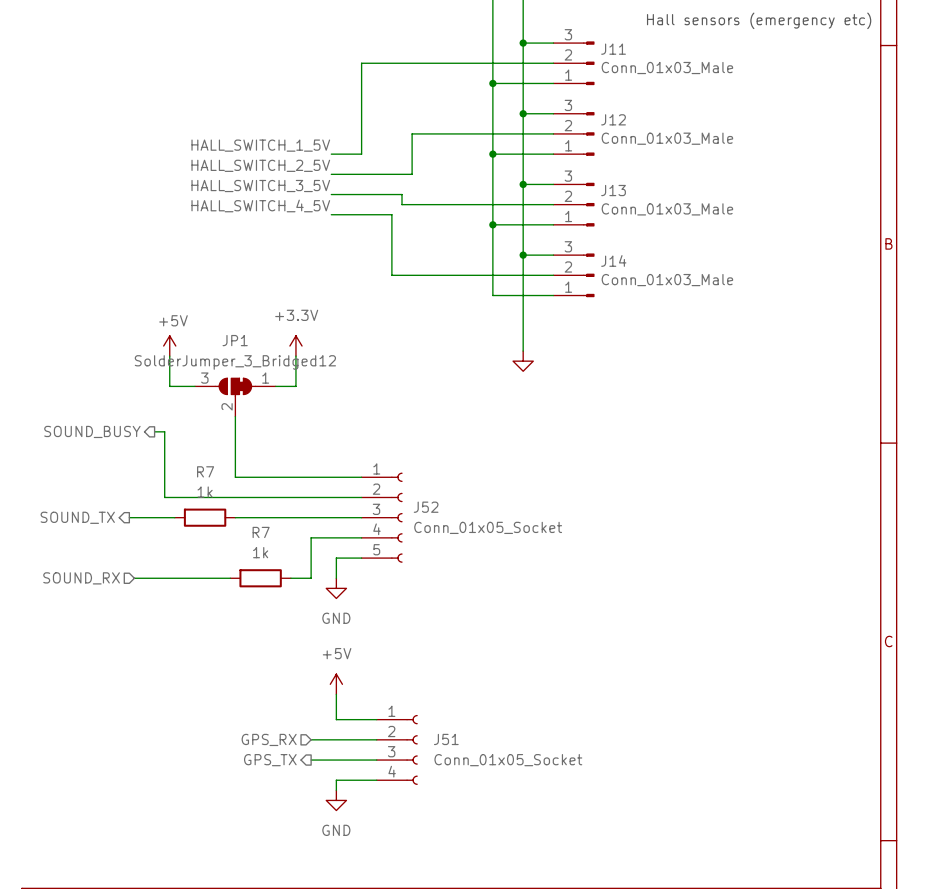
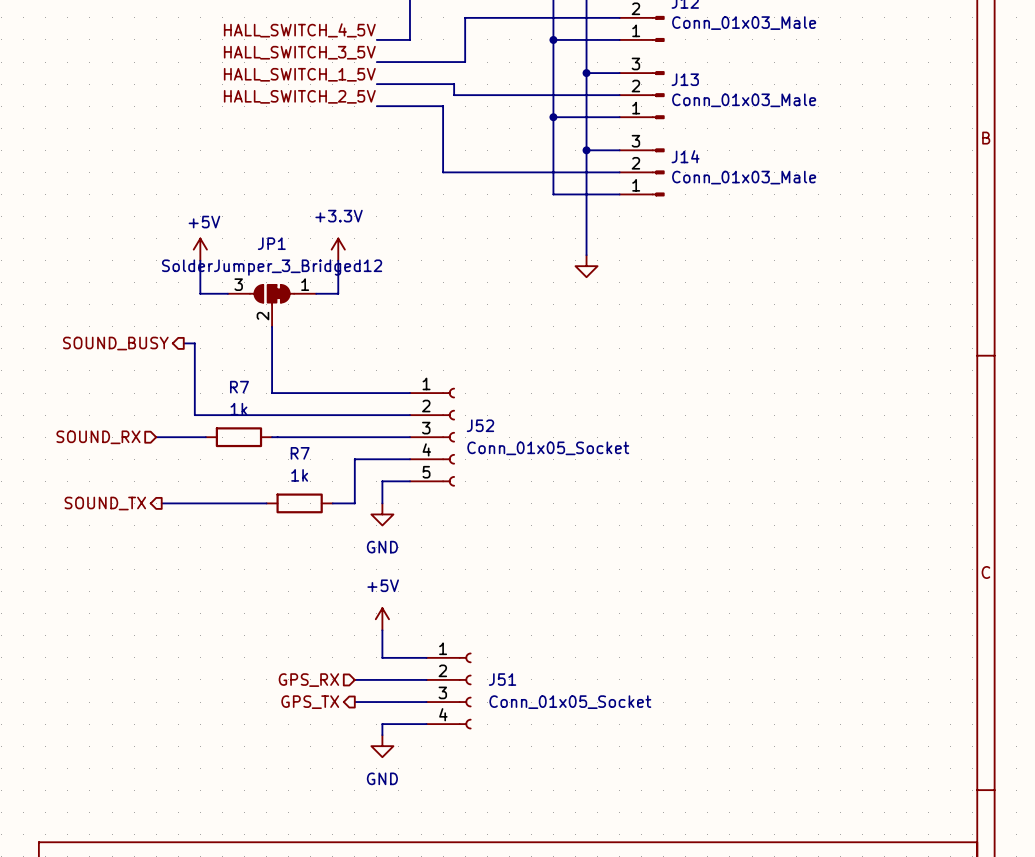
label: HALL_SWITCH_1_5V (260, 145) -> HALL_SWITCH_4_5V (299, 30)
label: HALL_SWITCH_2_5V (260, 165) -> HALL_SWITCH_3_5V (299, 52)
label: HALL_SWITCH_3_5V (260, 186) -> HALL_SWITCH_1_5V (299, 74)
label: HALL_SWITCH_4_5V (260, 205) -> HALL_SWITCH_2_5V (299, 96)
hierarchical label shape: output (77, 517) -> input (98, 437)
hierarchical label: SOUND_TX (77, 517) -> SOUND_RX (98, 437)
hierarchical label shape: input (81, 578) -> output (105, 503)
hierarchical label: SOUND_RX (81, 578) -> SOUND_TX (105, 503)

